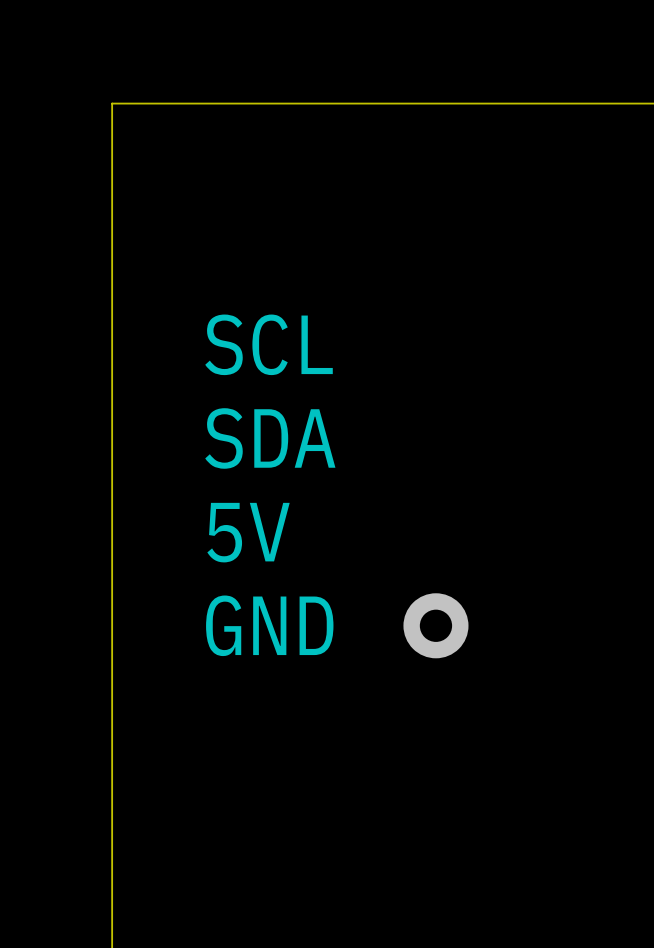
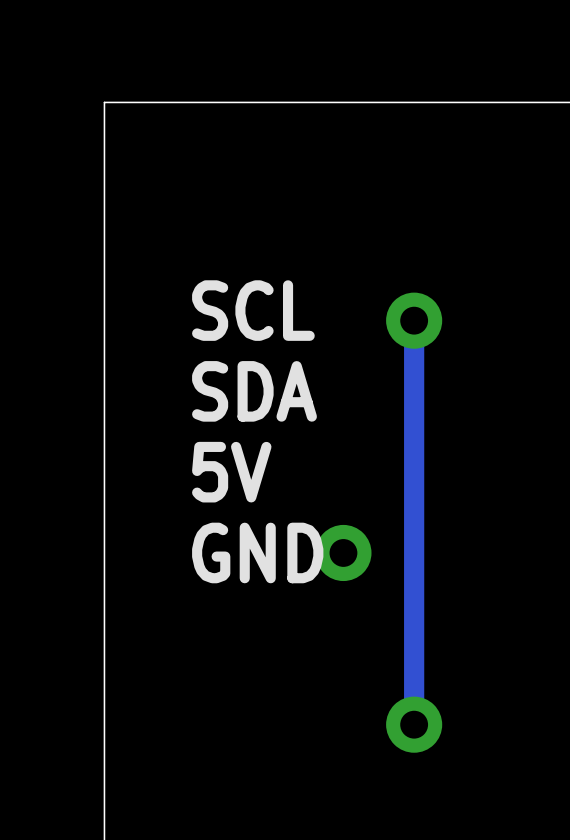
track: none -> (414, 320) (414, 724)
via: none -> (414, 320)
via position: (435, 625) -> (343, 552)
via: none -> (414, 724)

